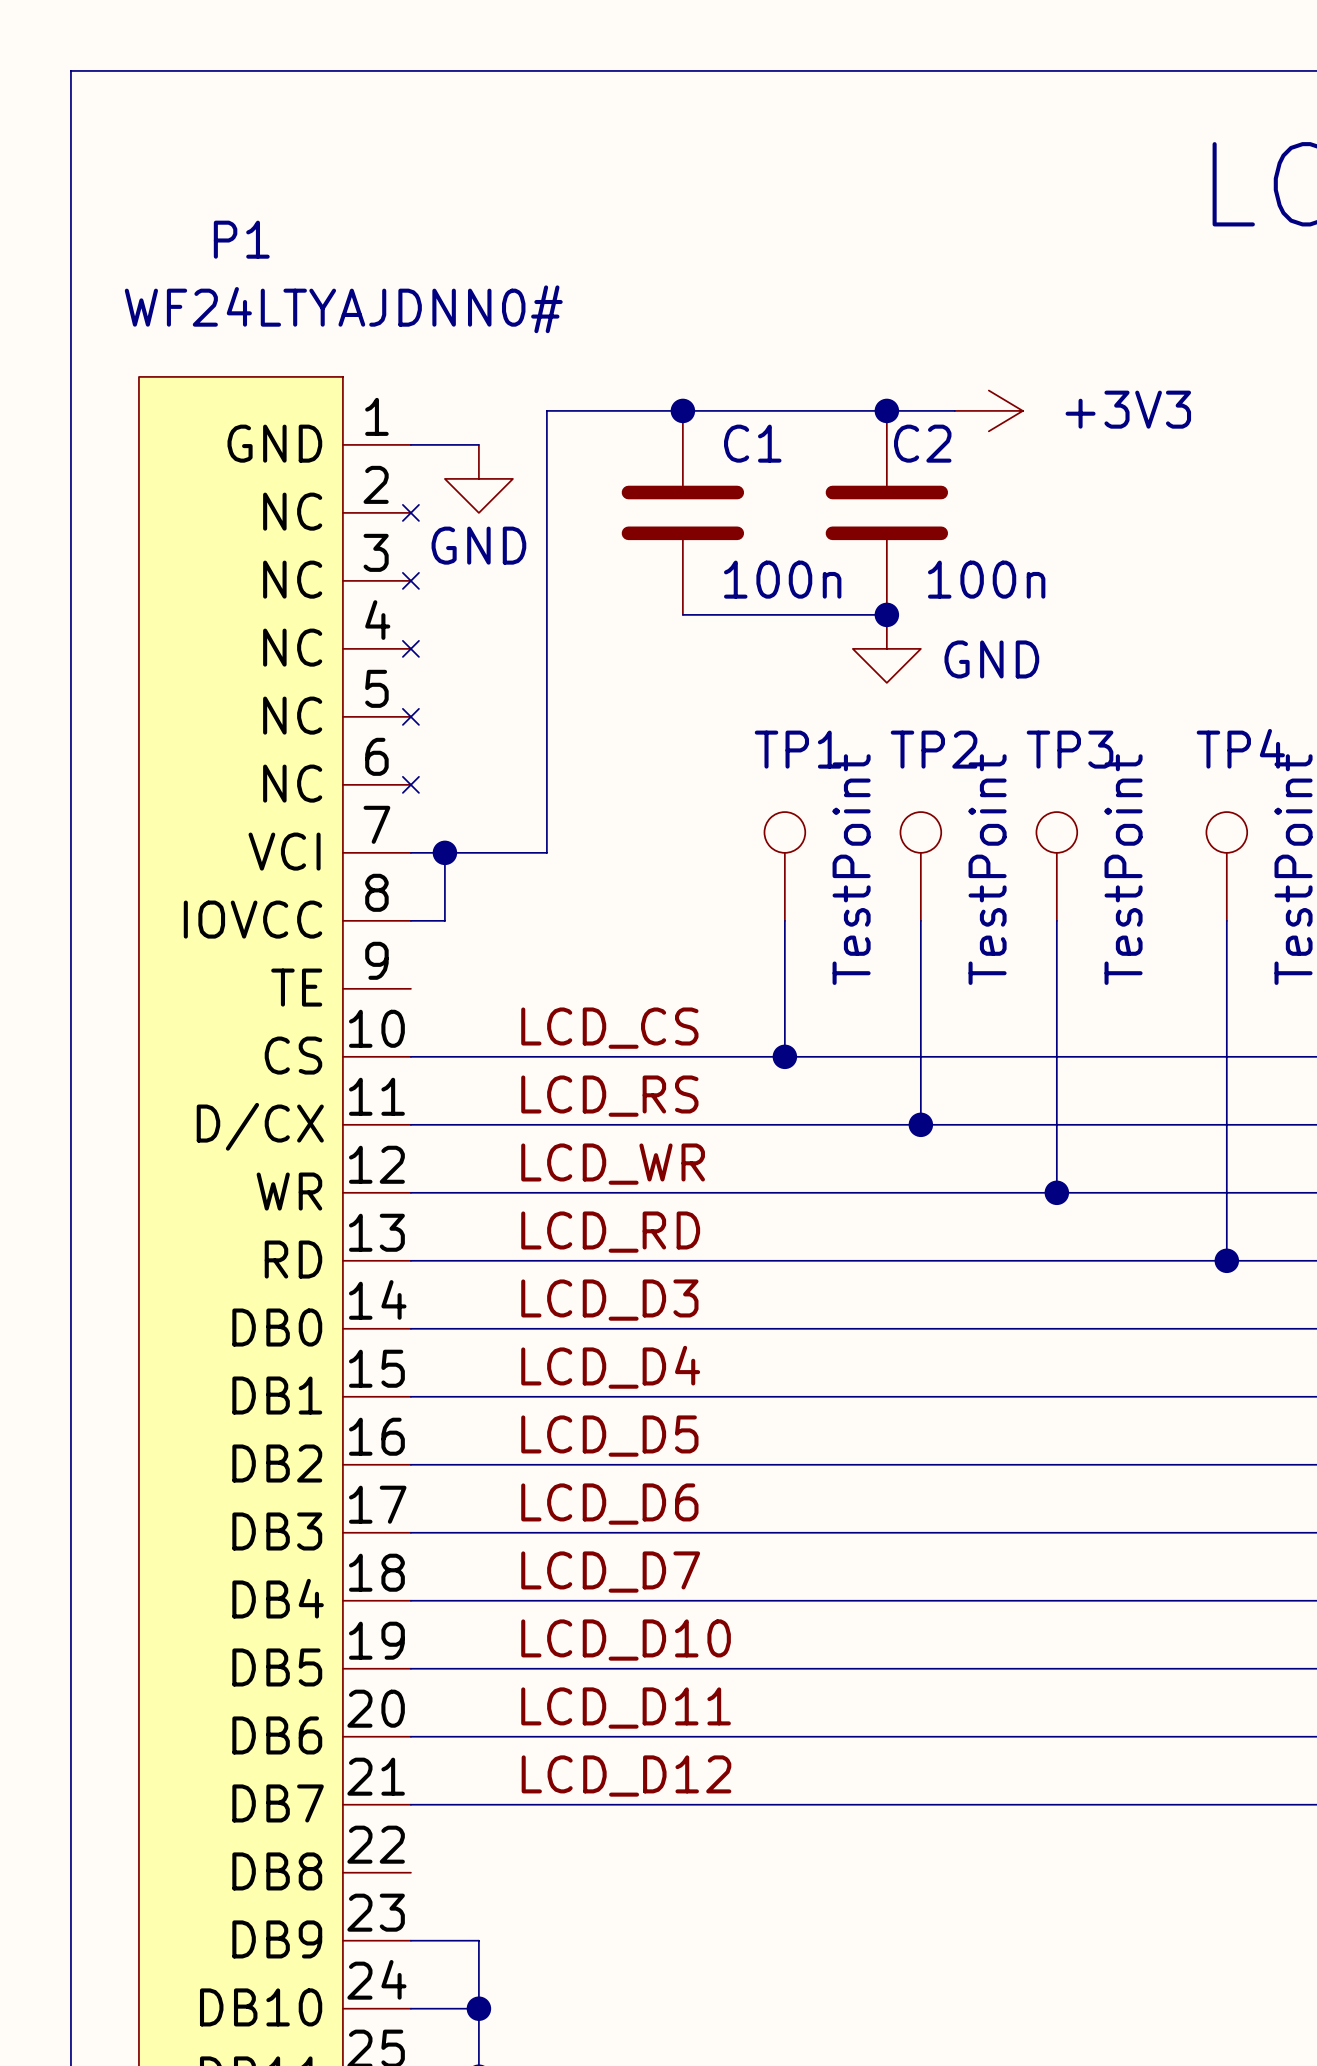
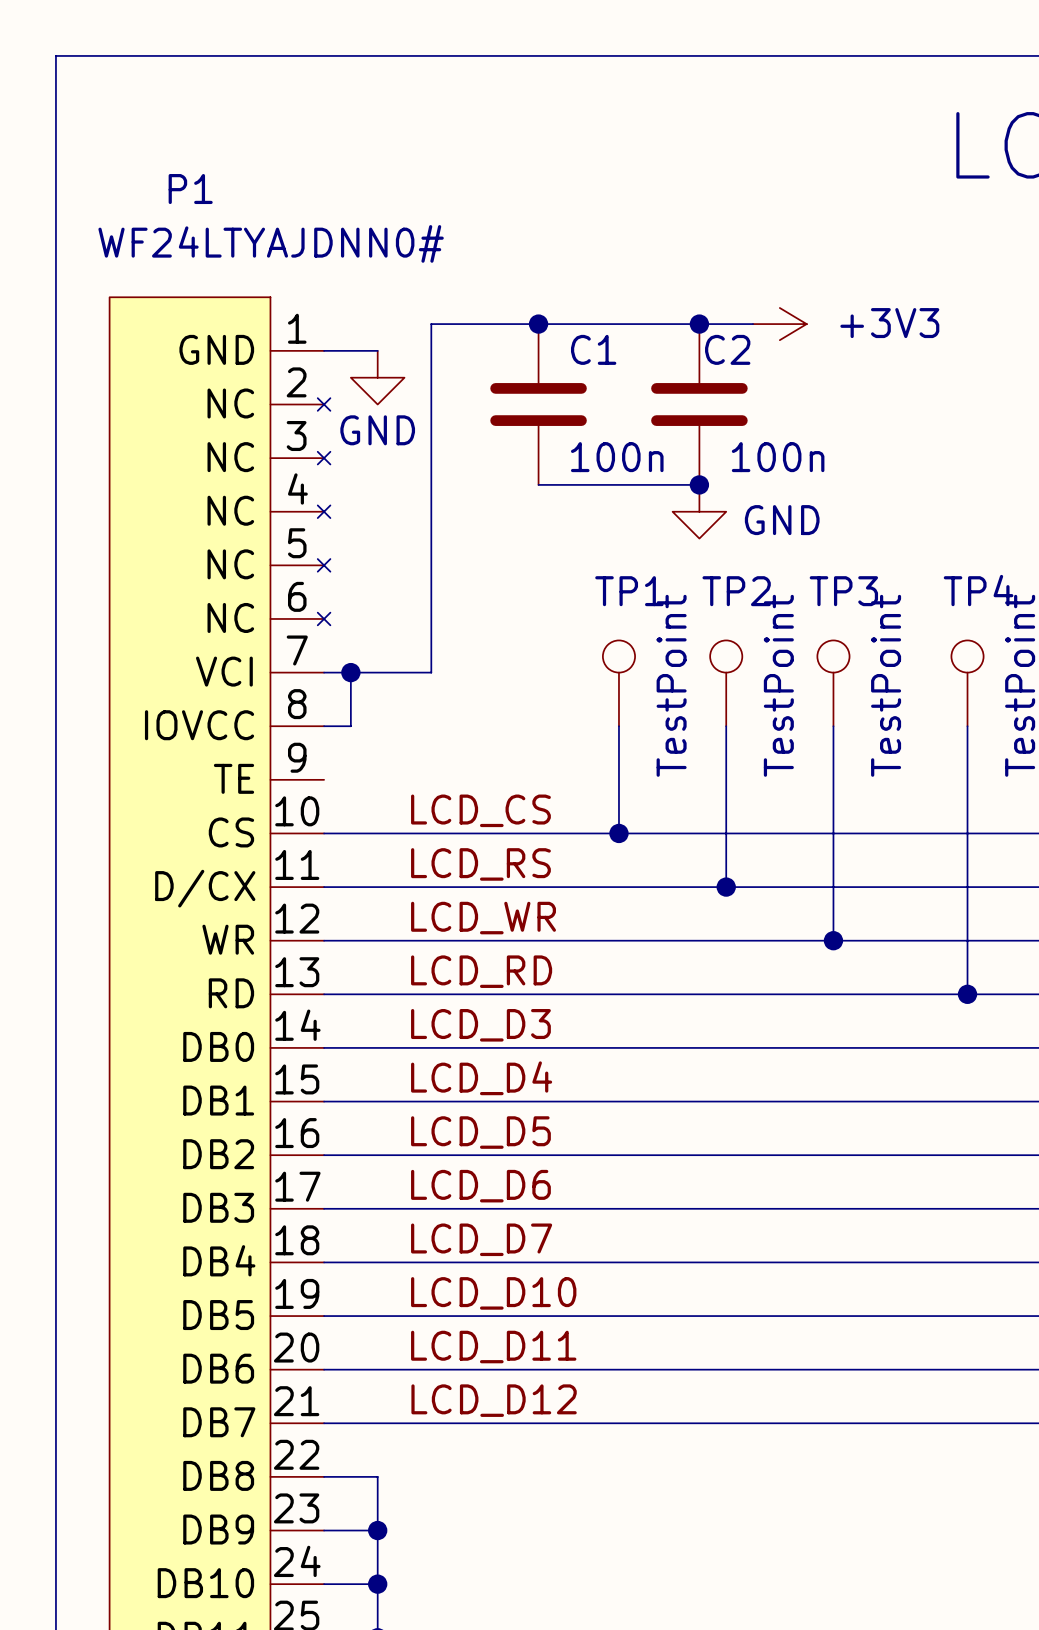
wire: none -> (324, 1476) (377, 1476) (377, 1530)
junction: none -> (377, 1530)

